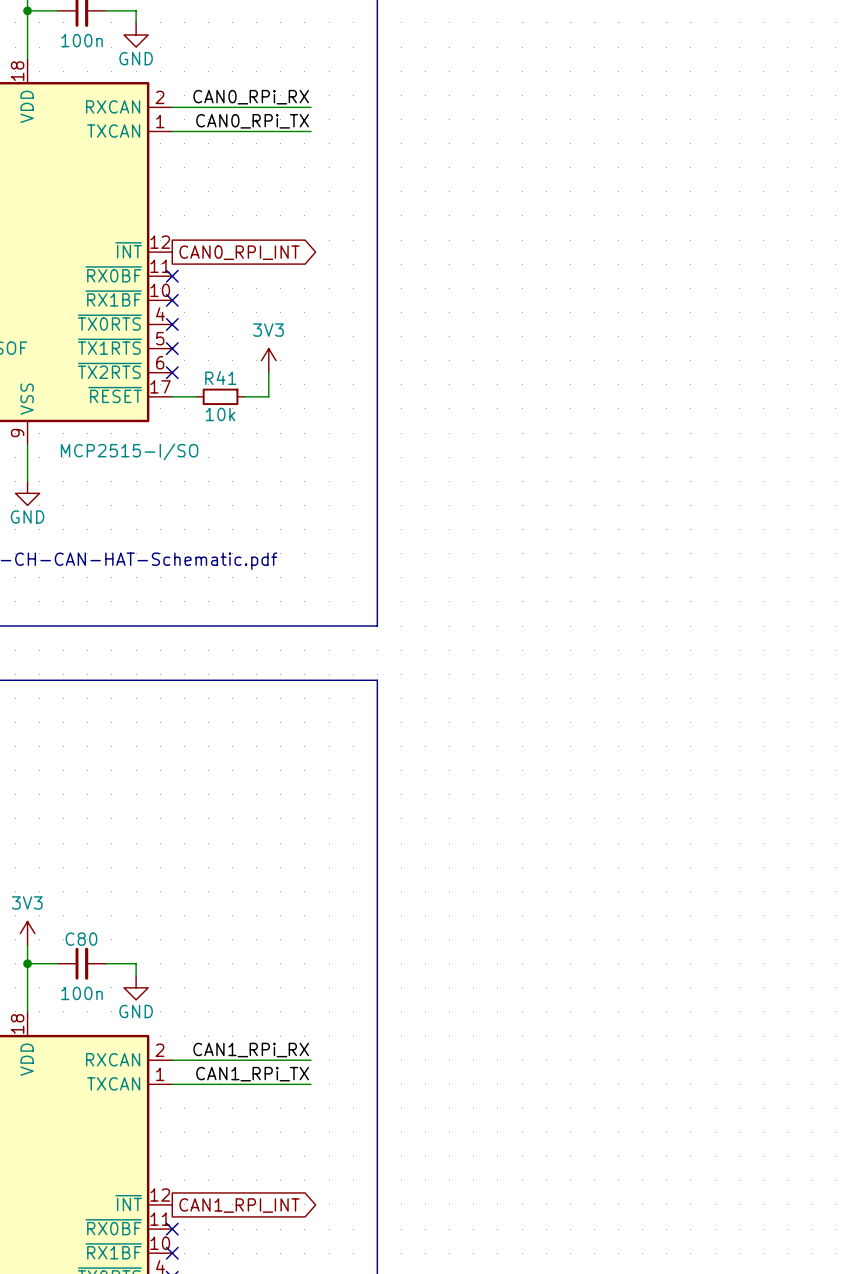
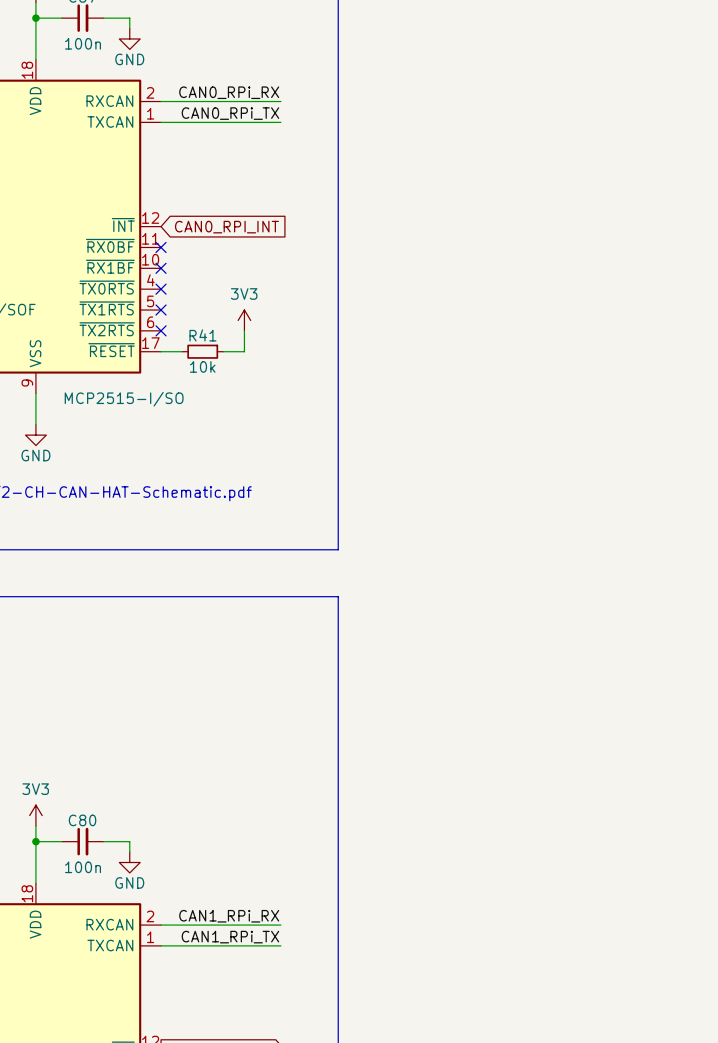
global label shape: output (239, 252) -> input (226, 227)

